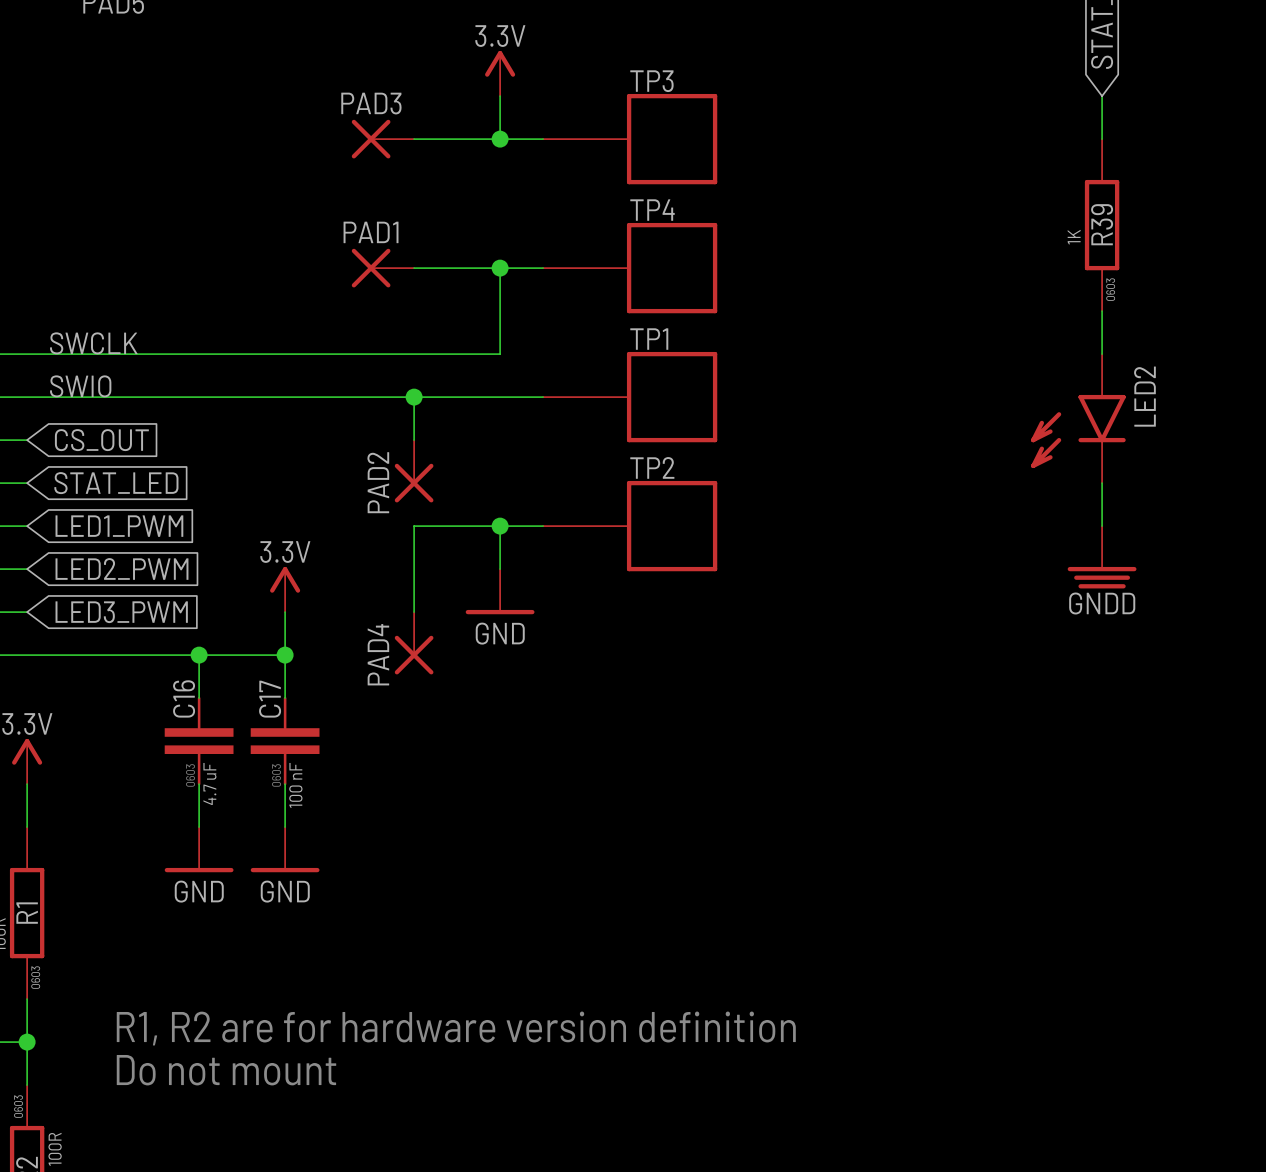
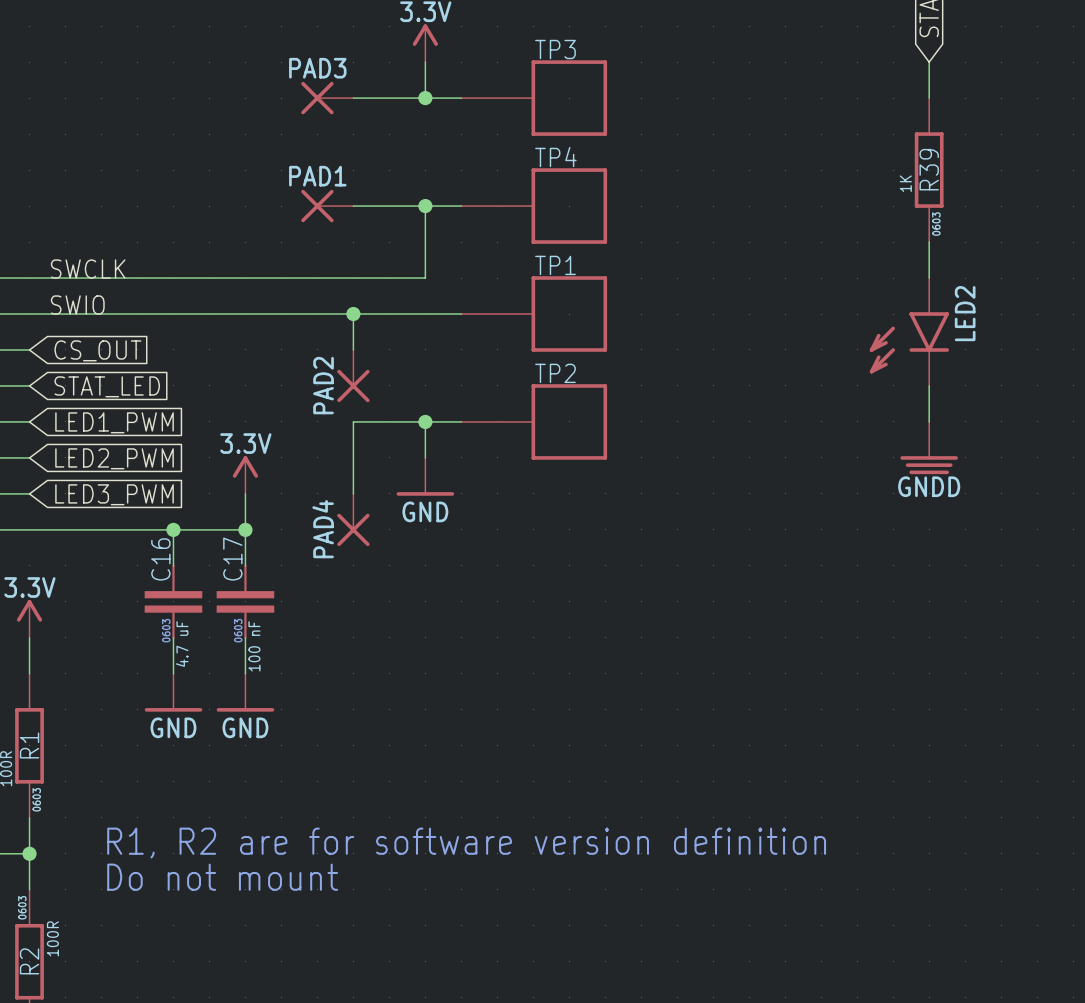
text: R1, R2 are for hardware version definition (456, 1028) -> R1, R2 are for software version definition (466, 843)

